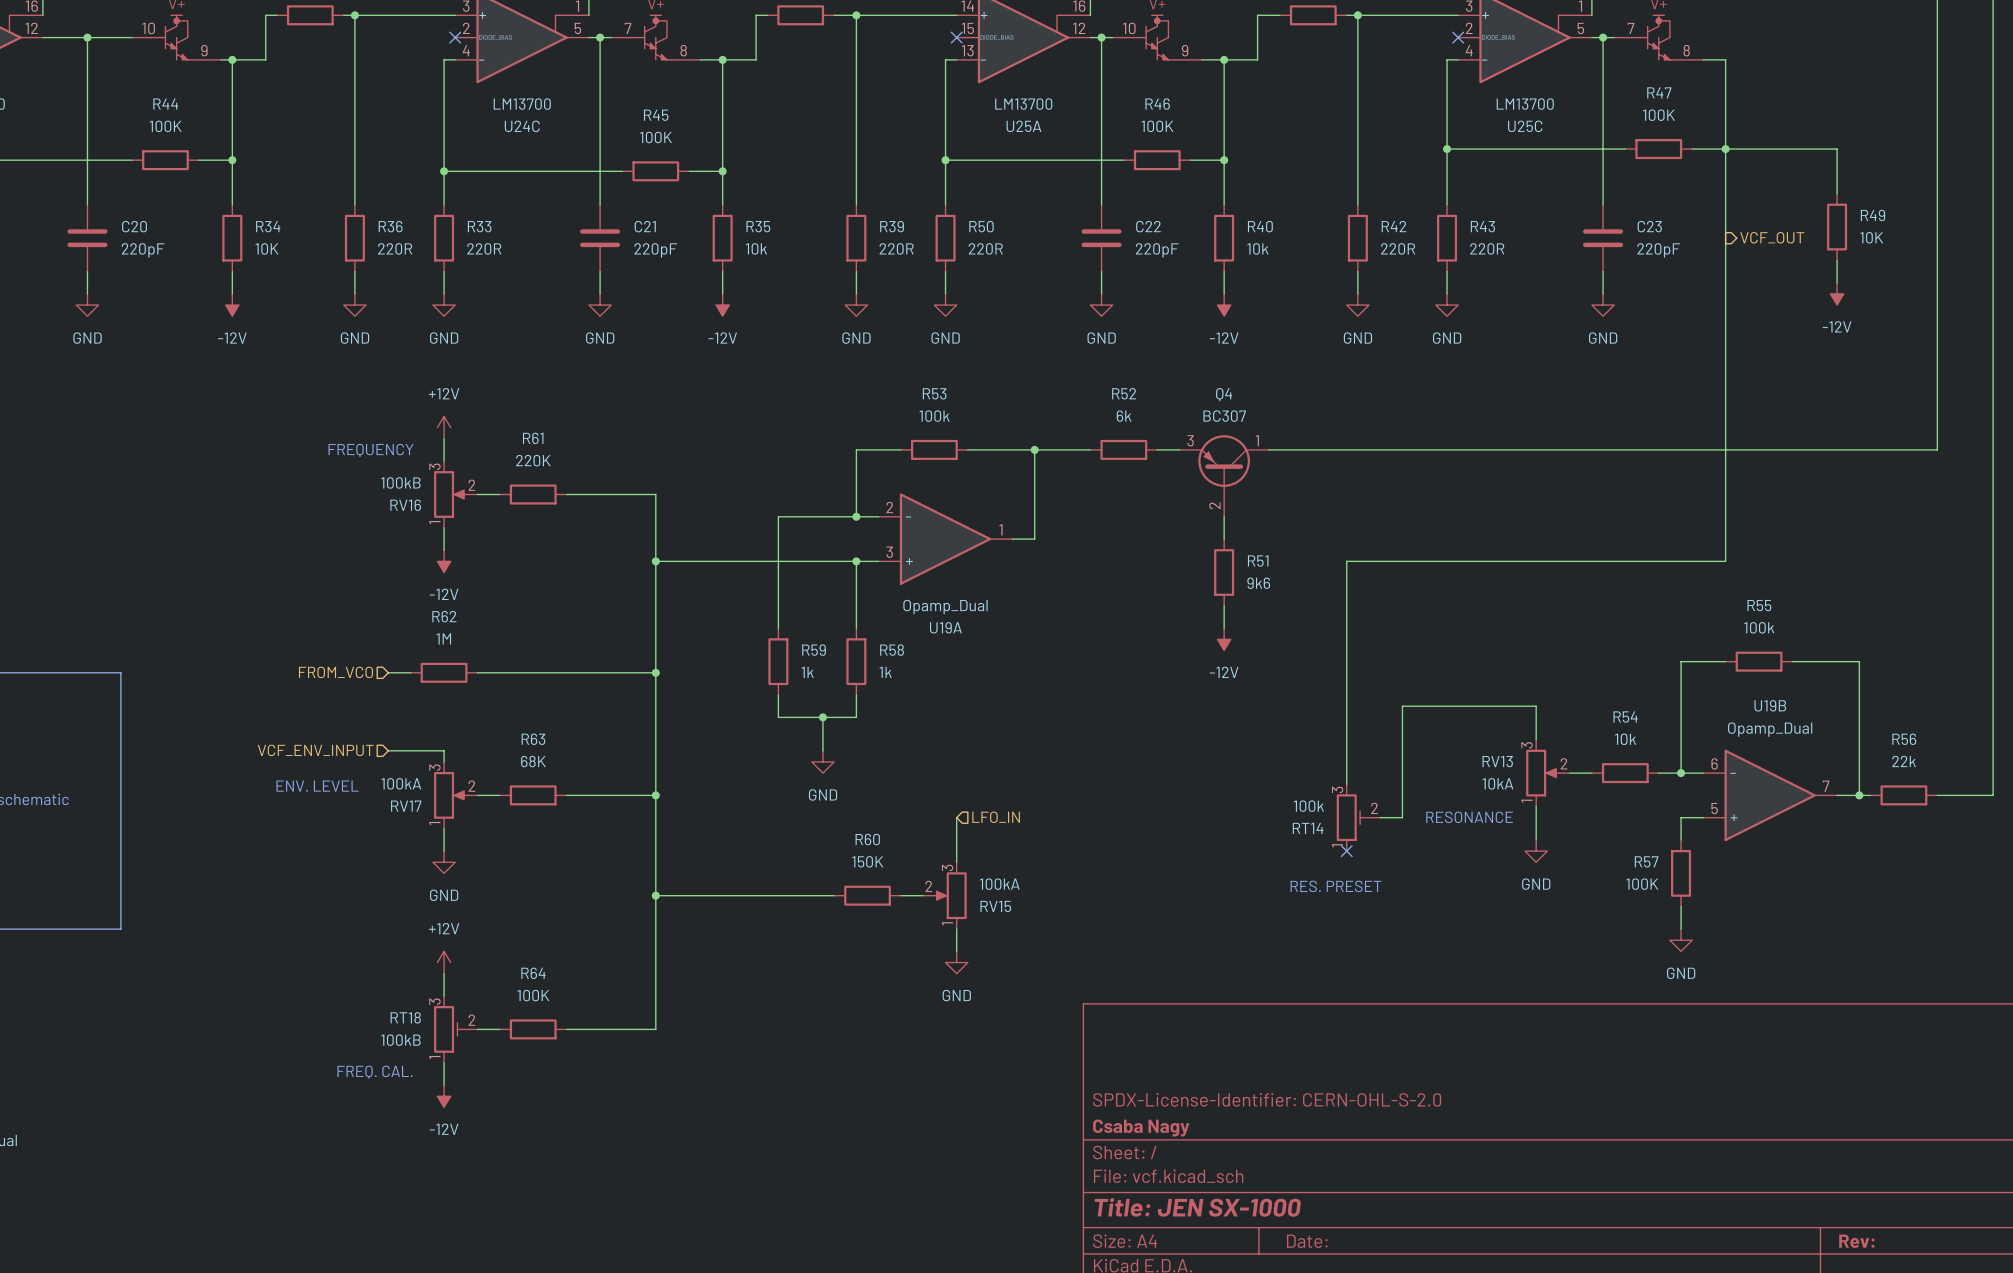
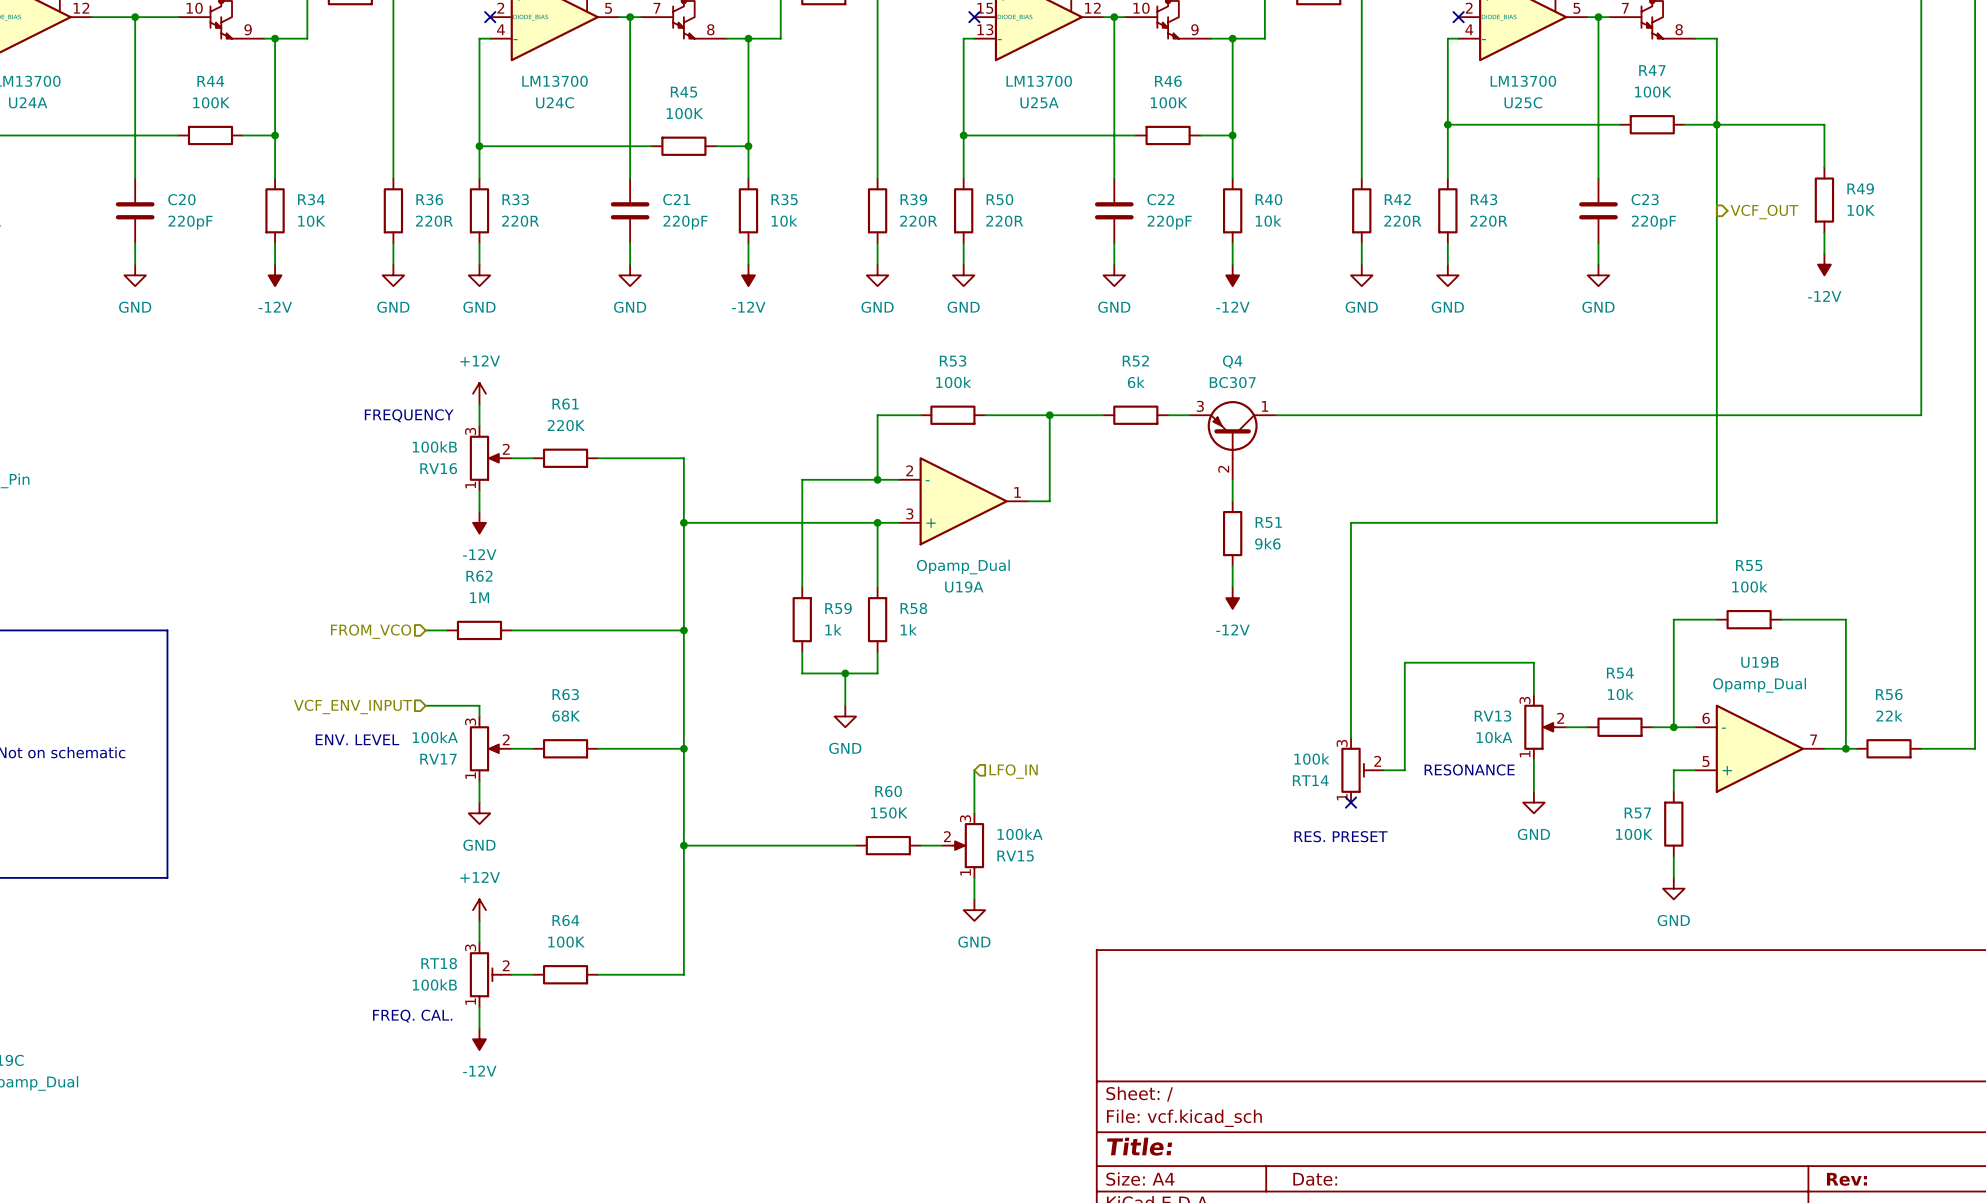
title block: SPDX-License-Identifier: CERN-OHL-S-2.0 (1267, 1099) -> none
title block: Csaba Nagy (1141, 1128) -> none
title block: Title: JEN SX-1000 (1197, 1207) -> Title: (1139, 1146)

